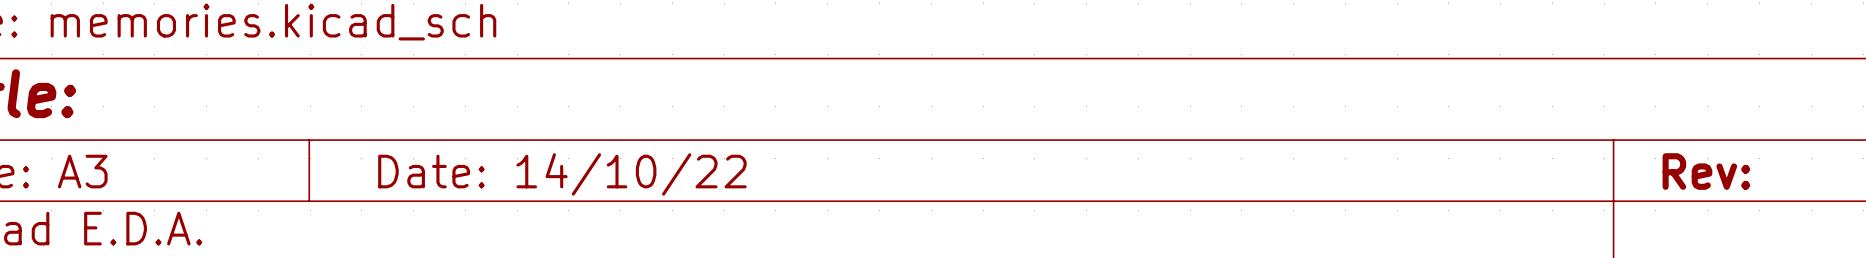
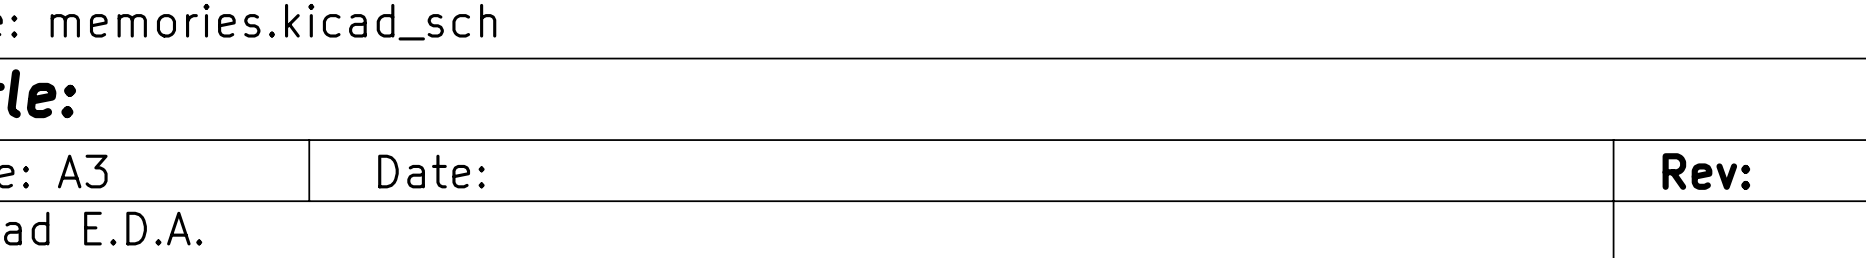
title block: Date: 14/10/22 (562, 174) -> Date: (431, 171)

